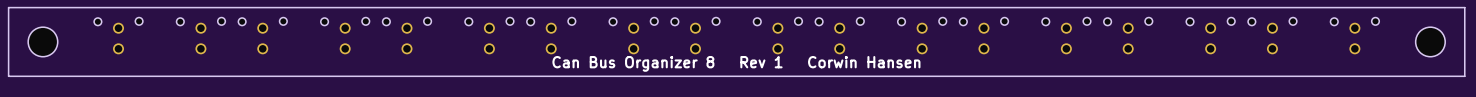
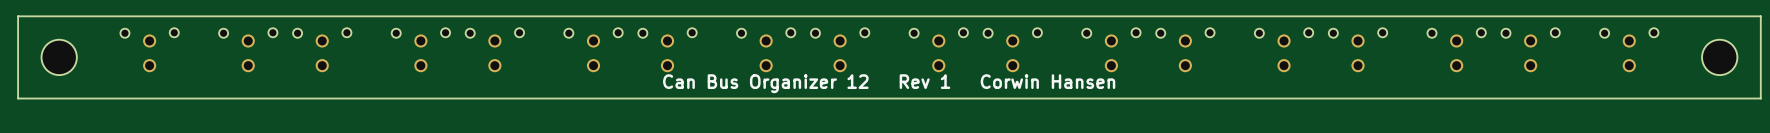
text: Can Bus Organizer 8 Rev 1 Corwin Hansen (736, 63) -> Can Bus Organizer 12 Rev 1 Corwin Hansen (889, 83)

